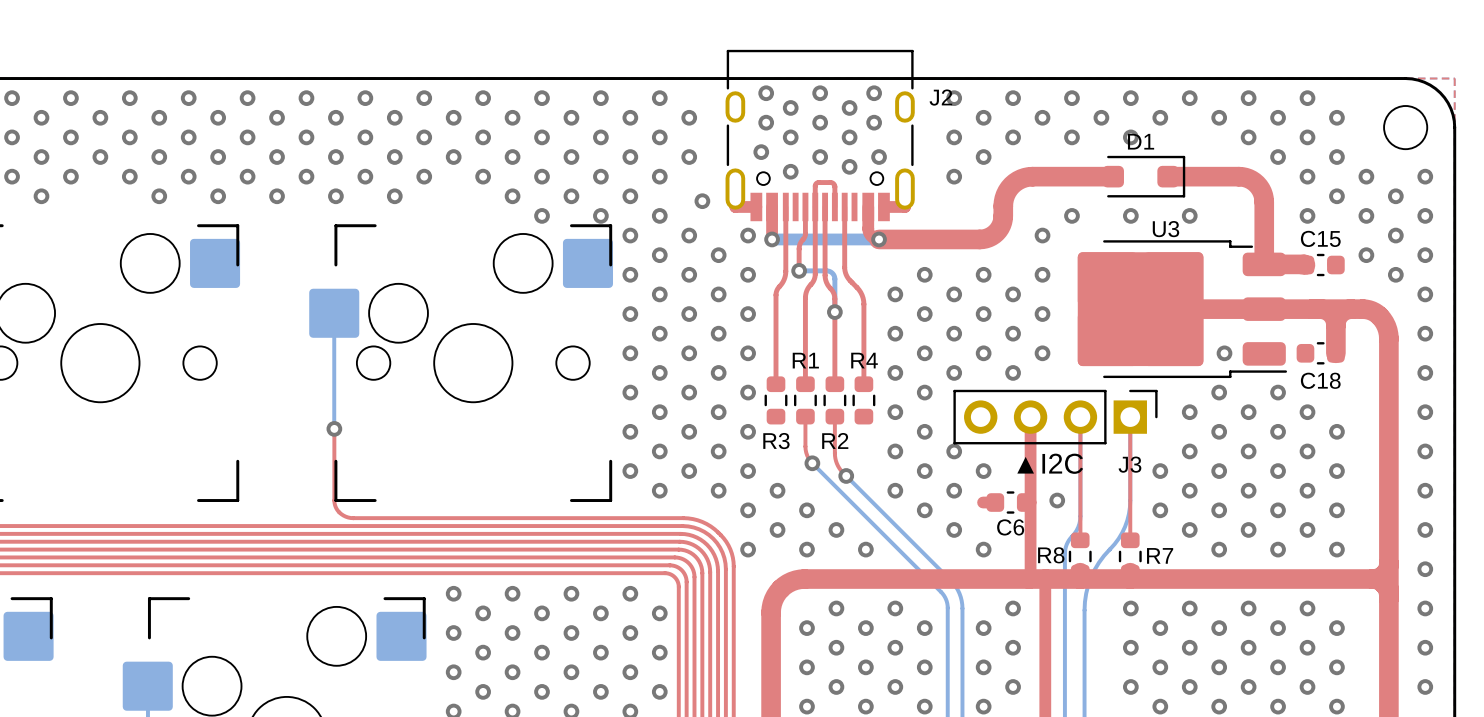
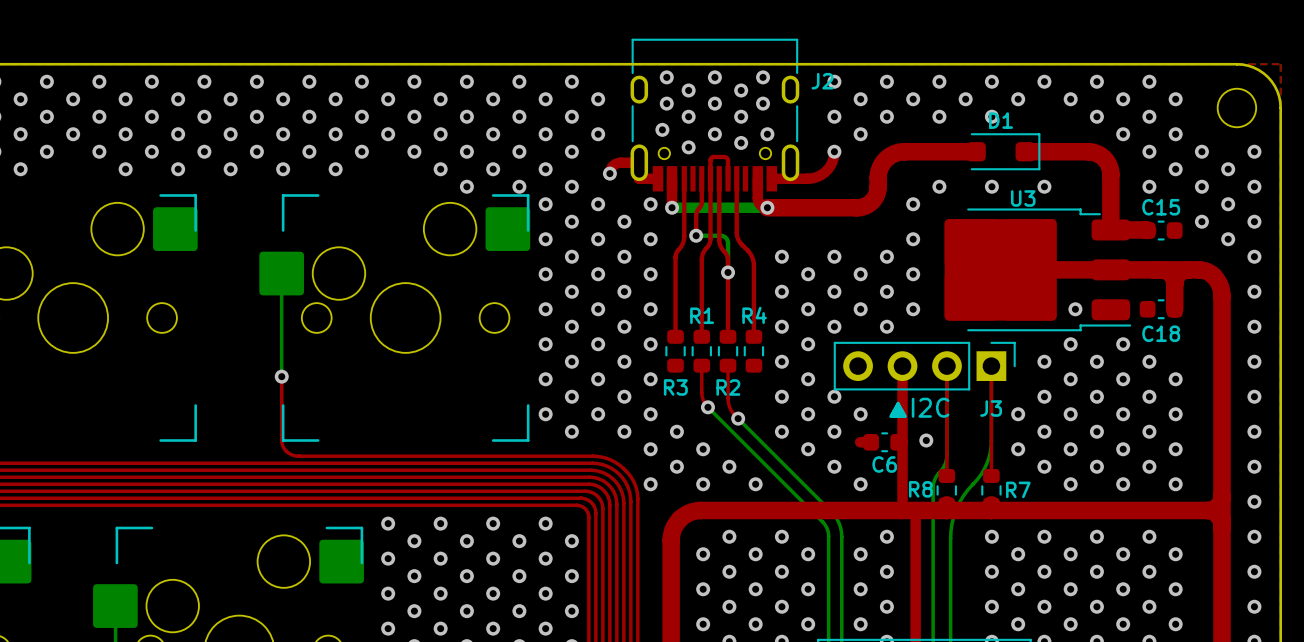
top track: none -> (834, 151) (831, 163) (821, 174) (810, 178) (790, 178)
top track: none -> (639, 162) (616, 163) (612, 167) (609, 173)
via: (924, 274) -> none
via: (983, 274) -> none

